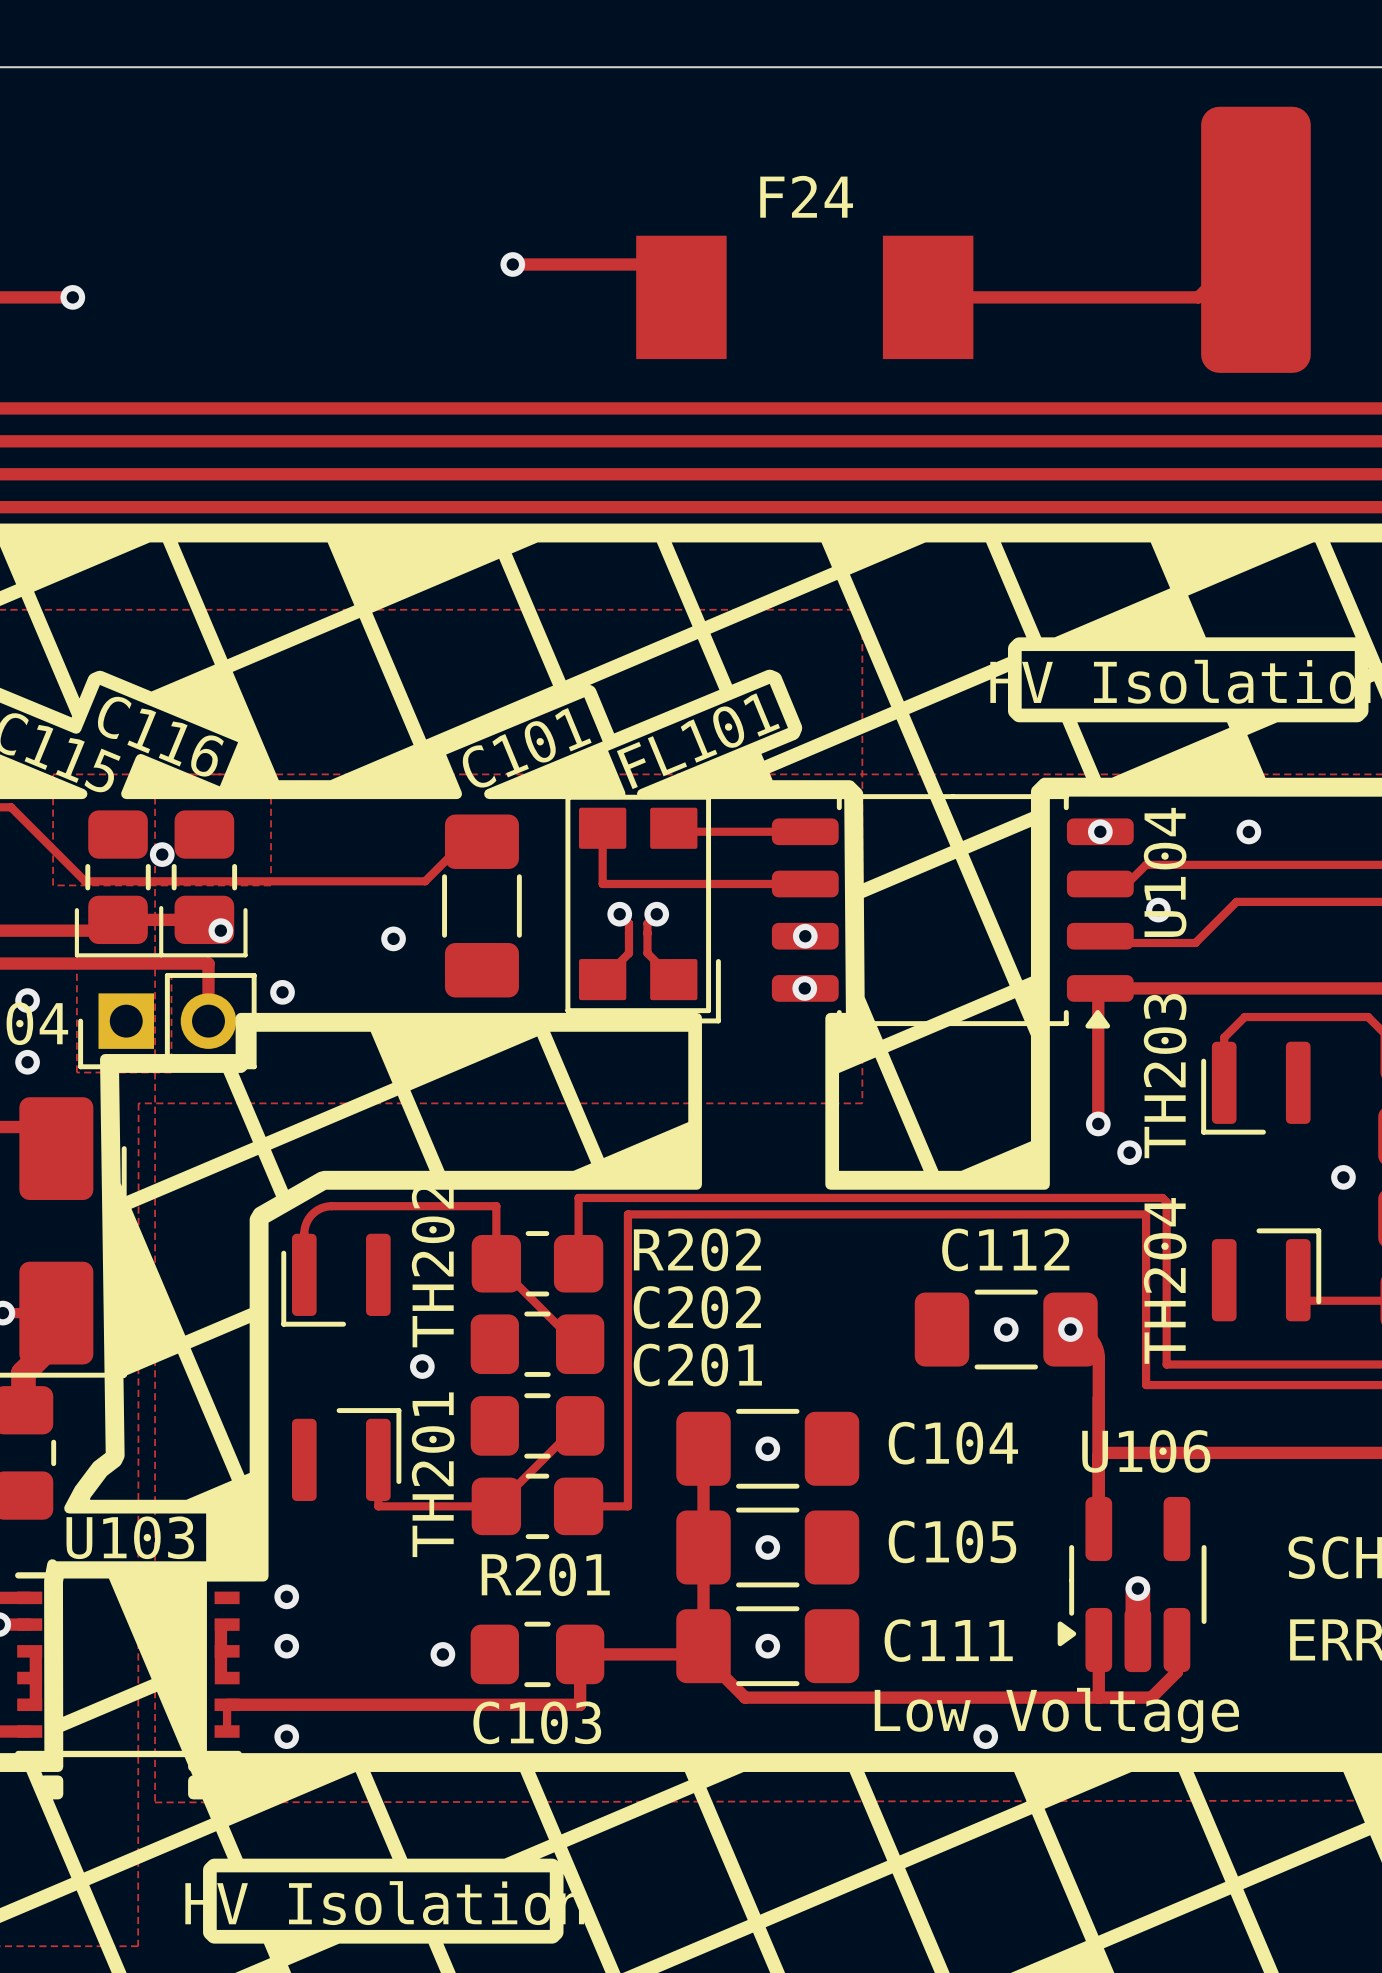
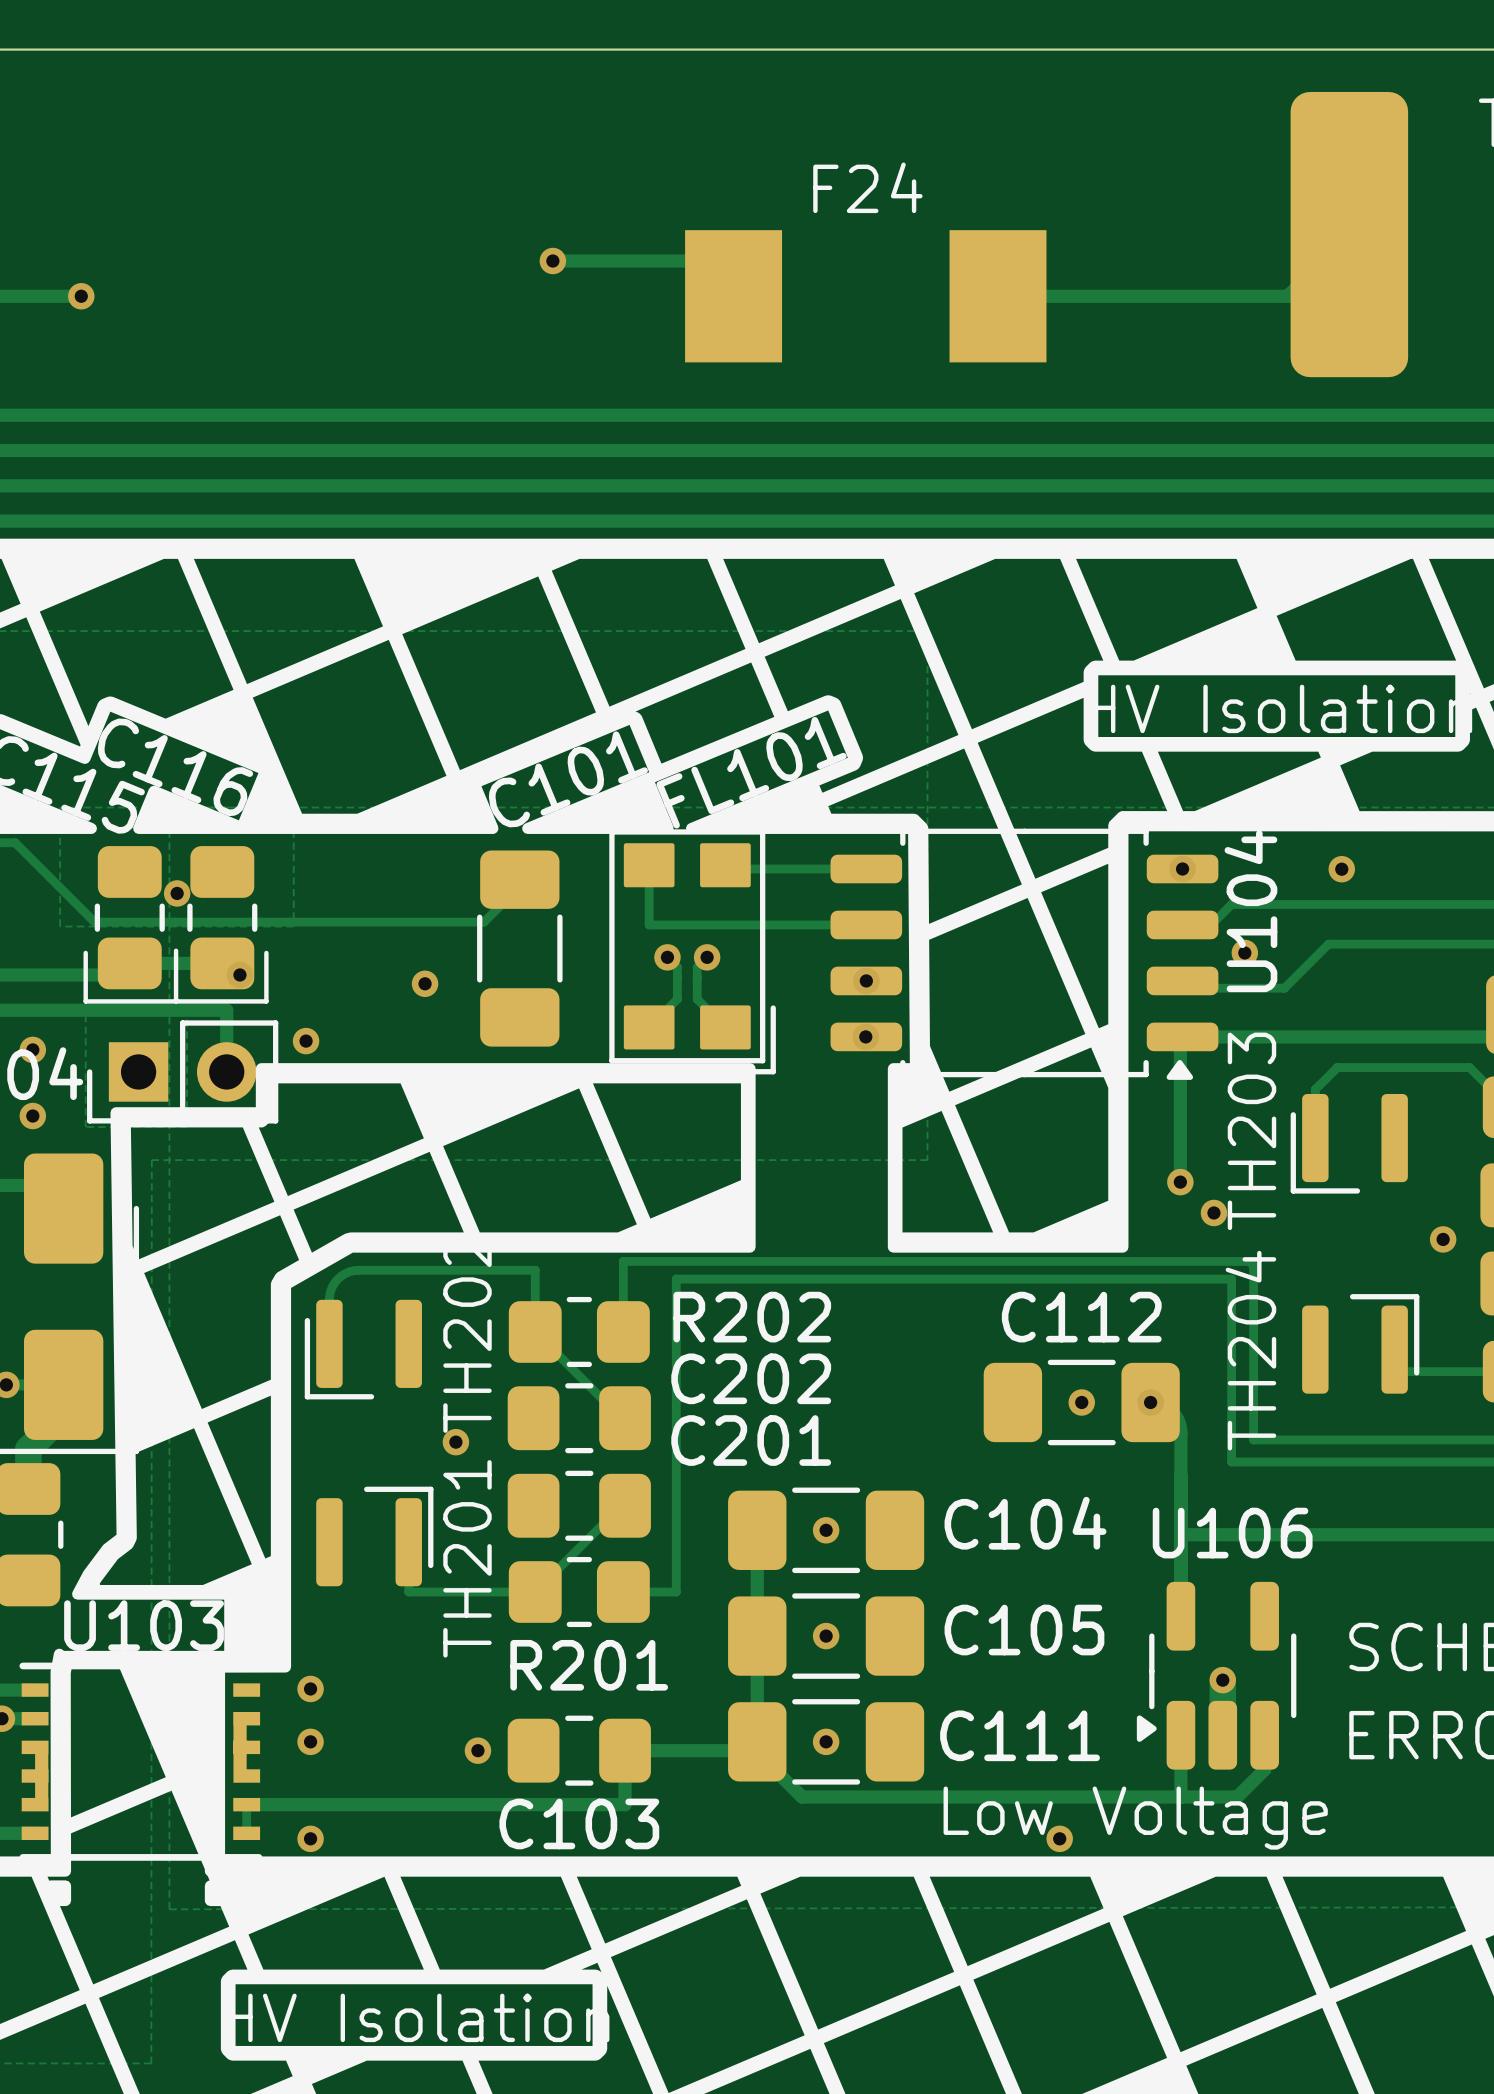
track: (473, 856) (449, 856) (425, 881) -> (510, 895) (484, 922) (458, 922)

